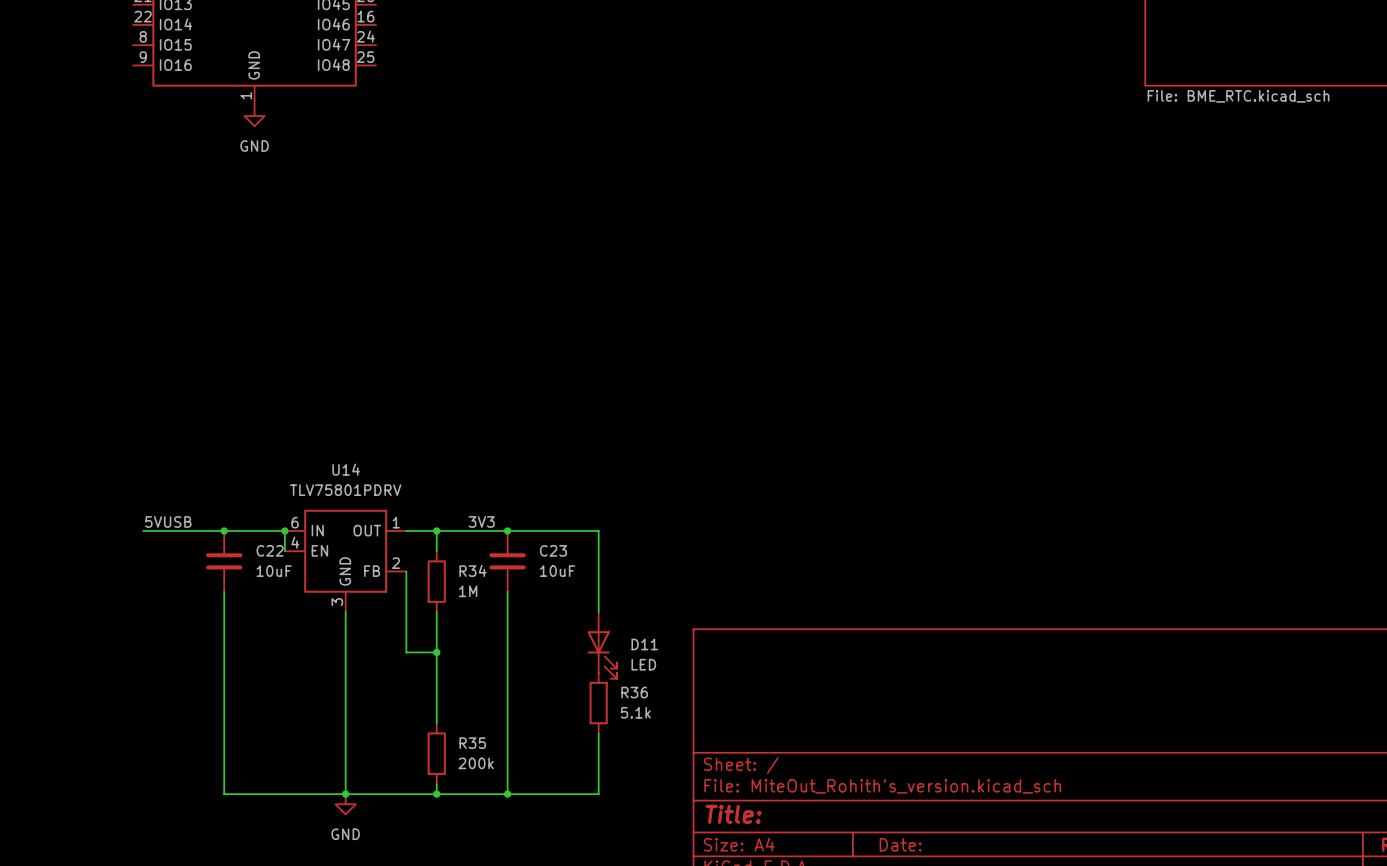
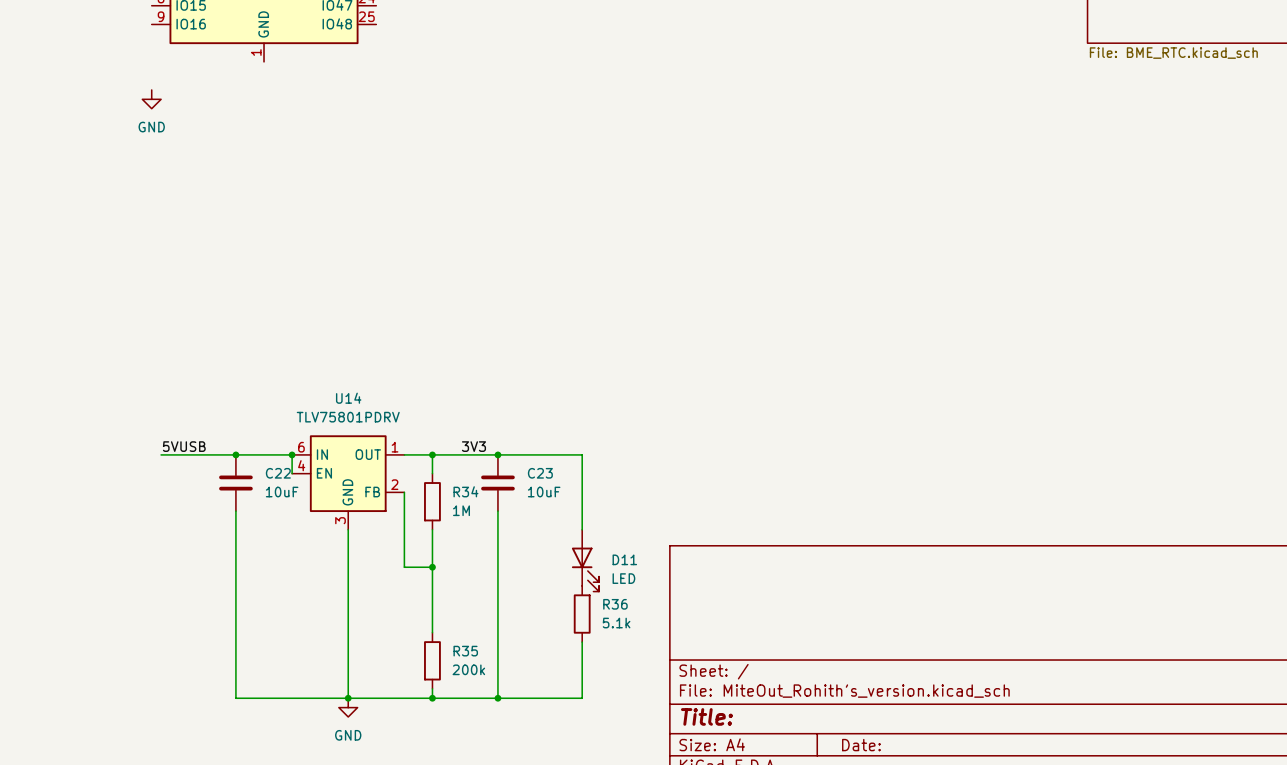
power symbol position: GND (254, 116) -> GND (151, 99)

